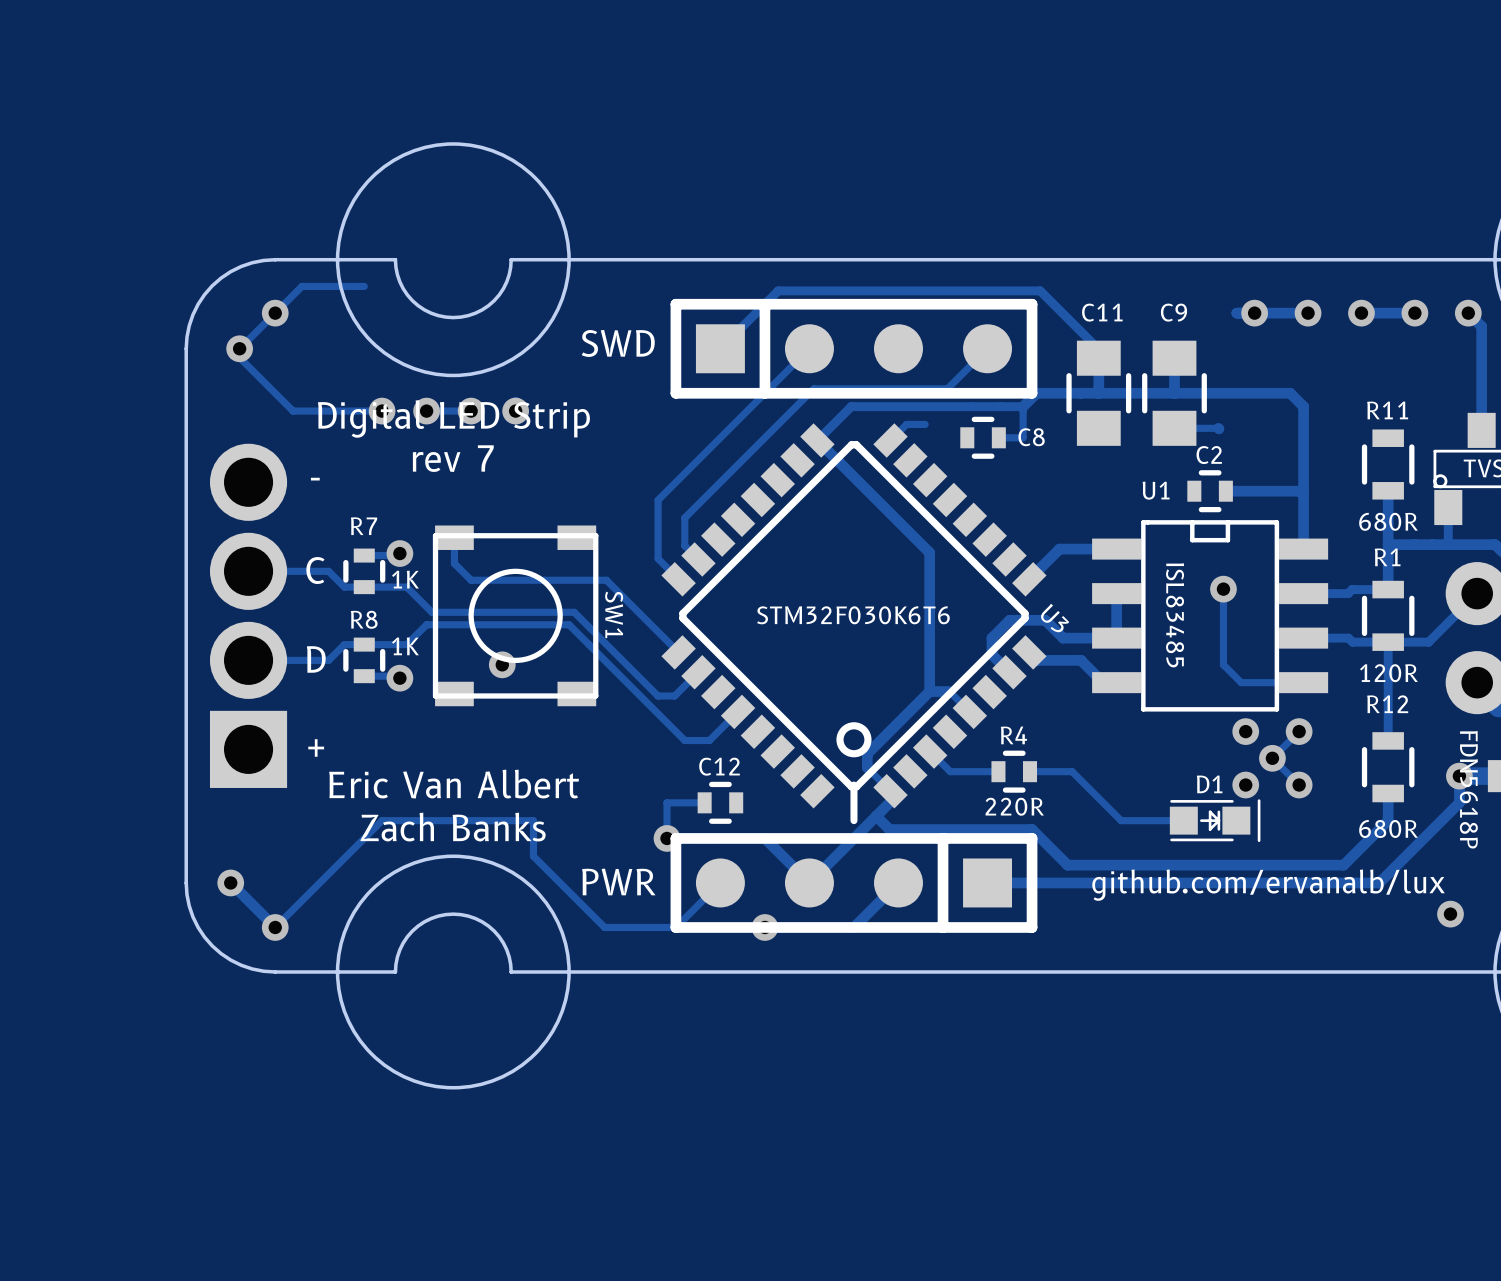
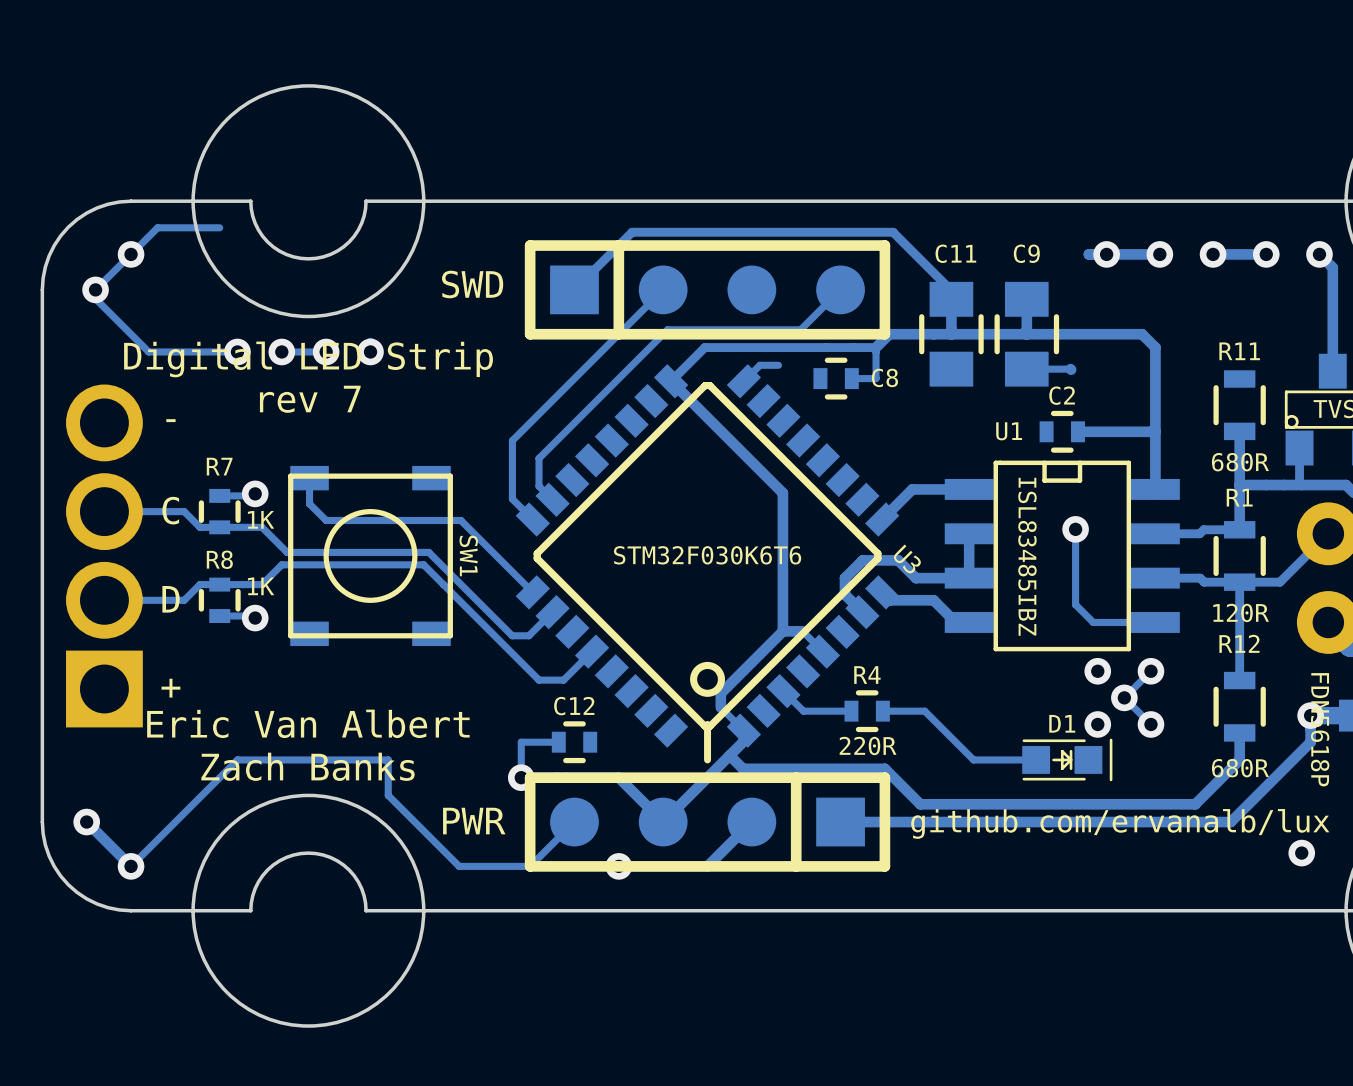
U1 value: ISL83485 (1175, 615) -> ISL83485IBZ (1027, 556)
via: (502, 664) -> none

